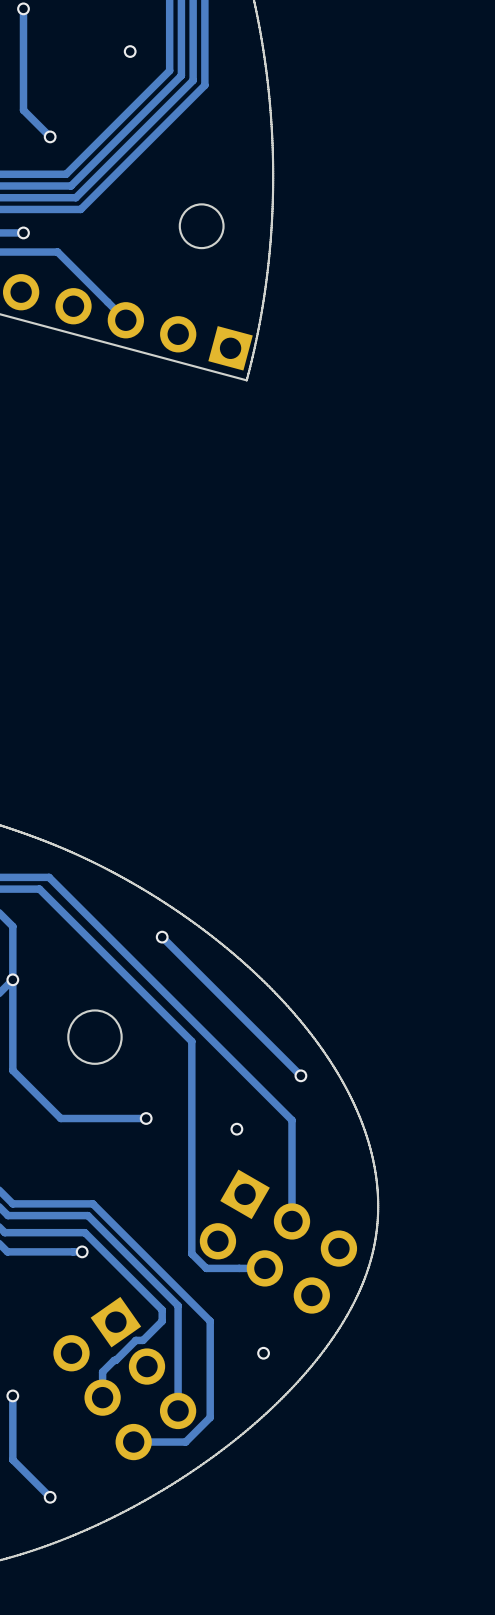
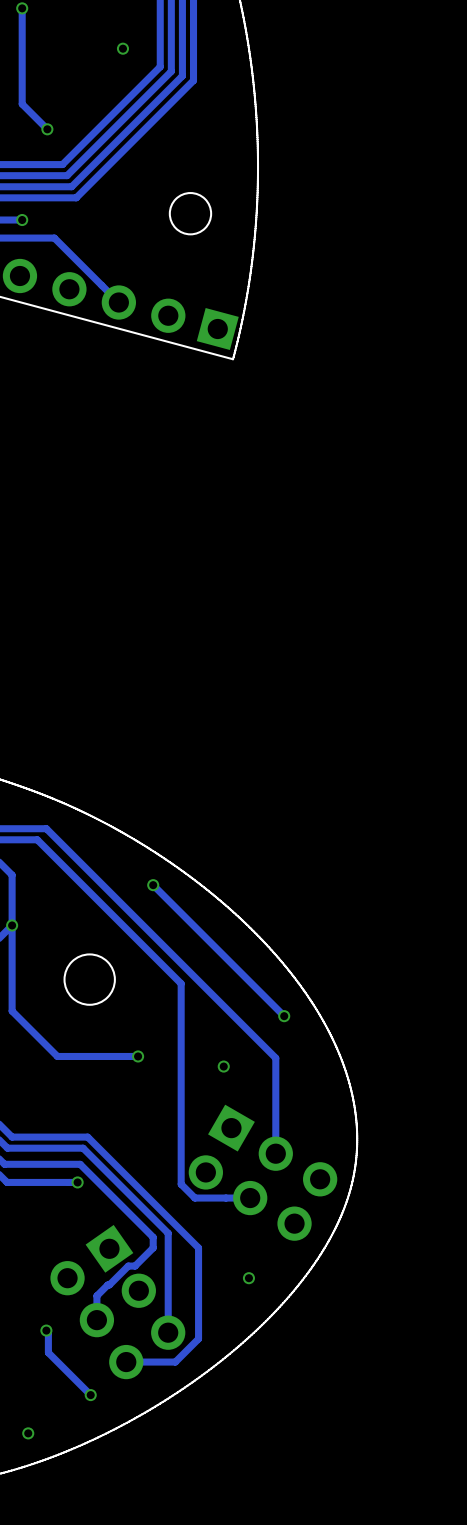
track: (12, 1395) (12, 1459) (50, 1497) -> none
via position: (12, 1395) -> (46, 1330)
track: none -> (46, 1330) (48, 1332) (48, 1352) (90, 1395)
via: none -> (90, 1395)
via: (50, 1497) -> none
via: none -> (28, 1433)

